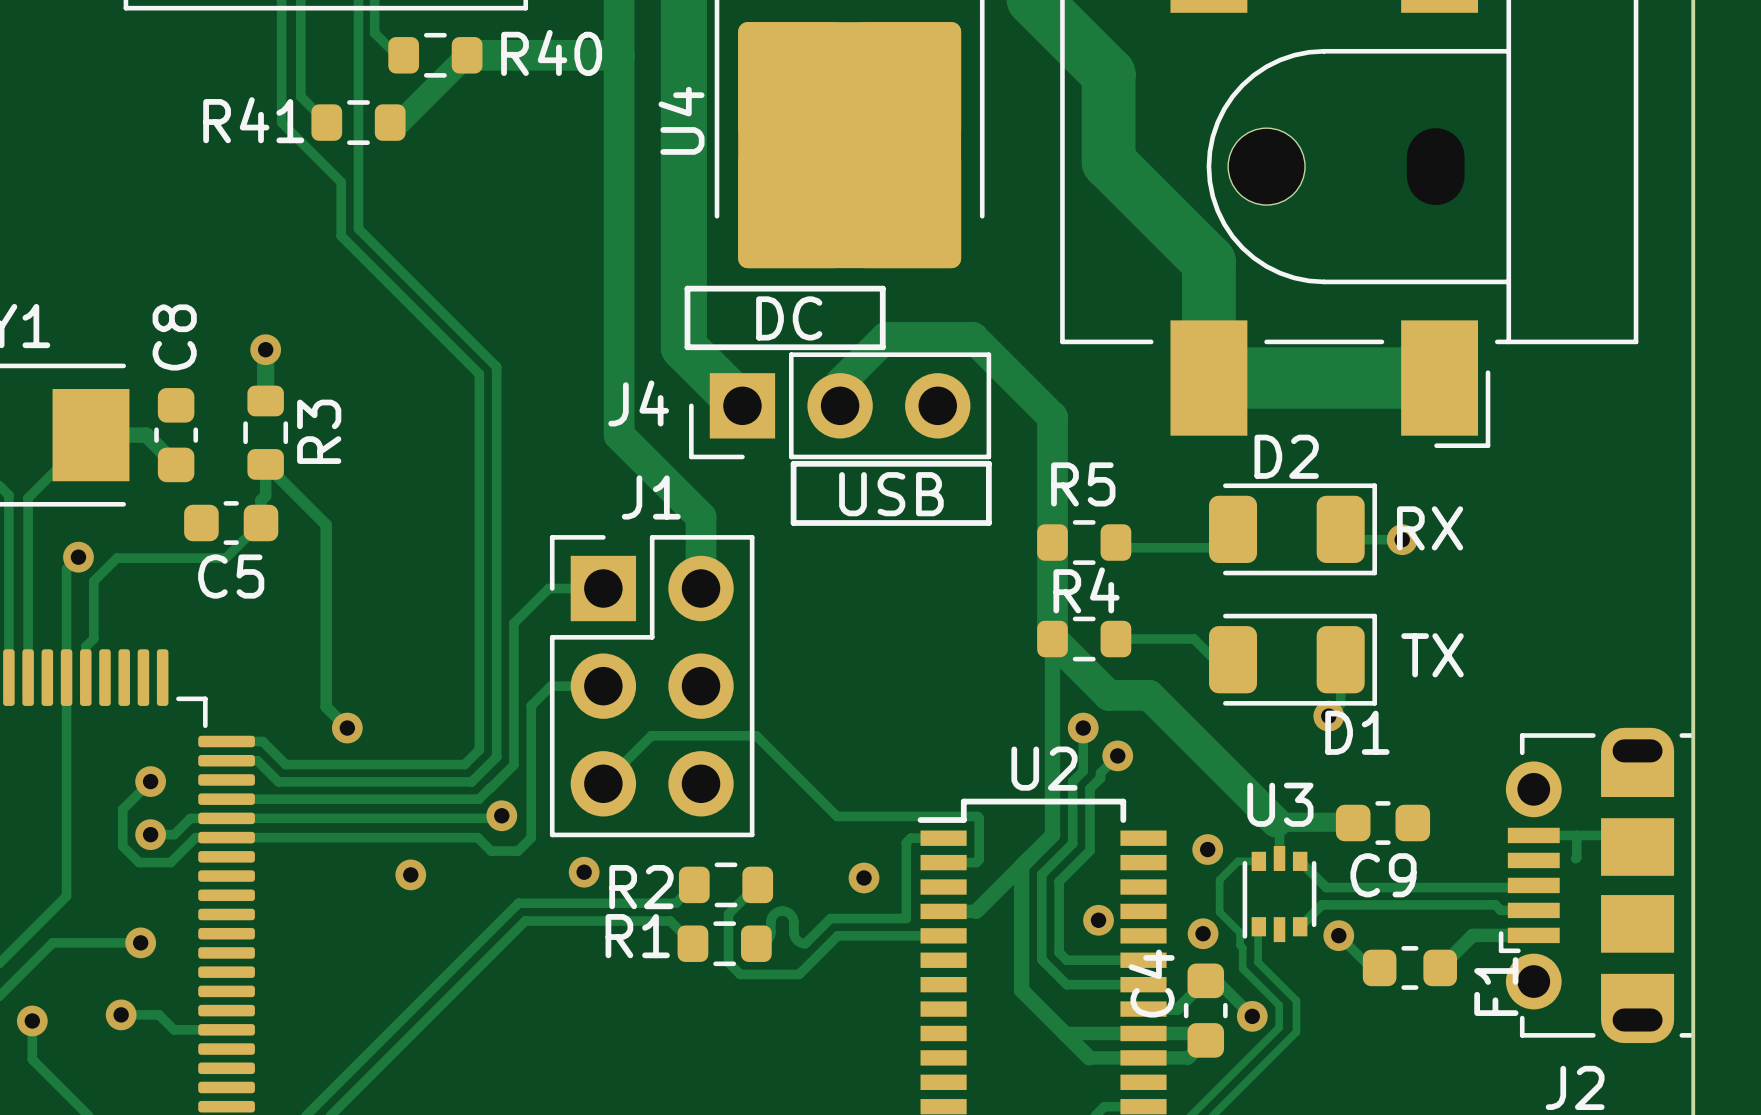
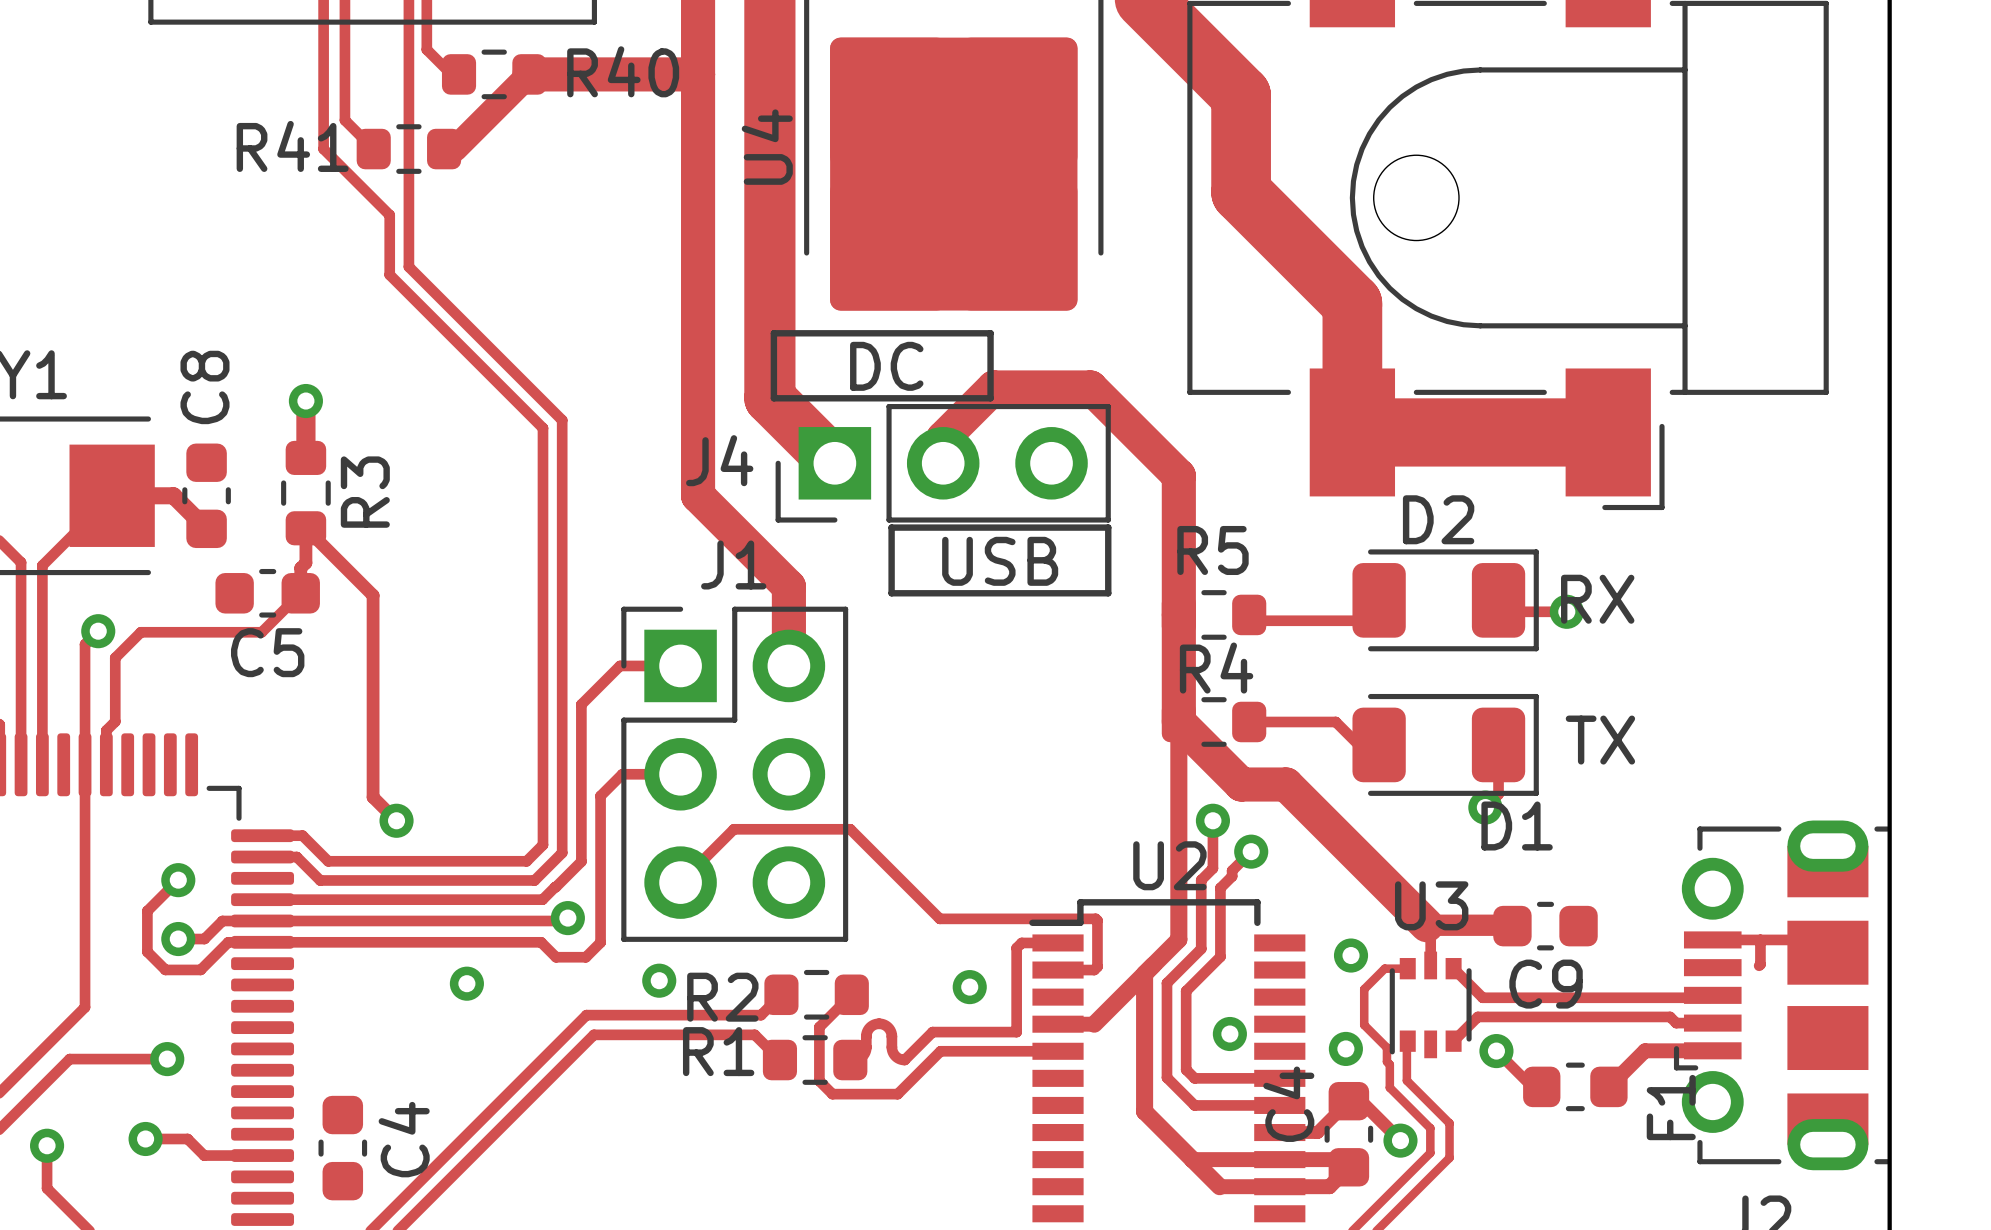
C4: none -> (342, 1148)

